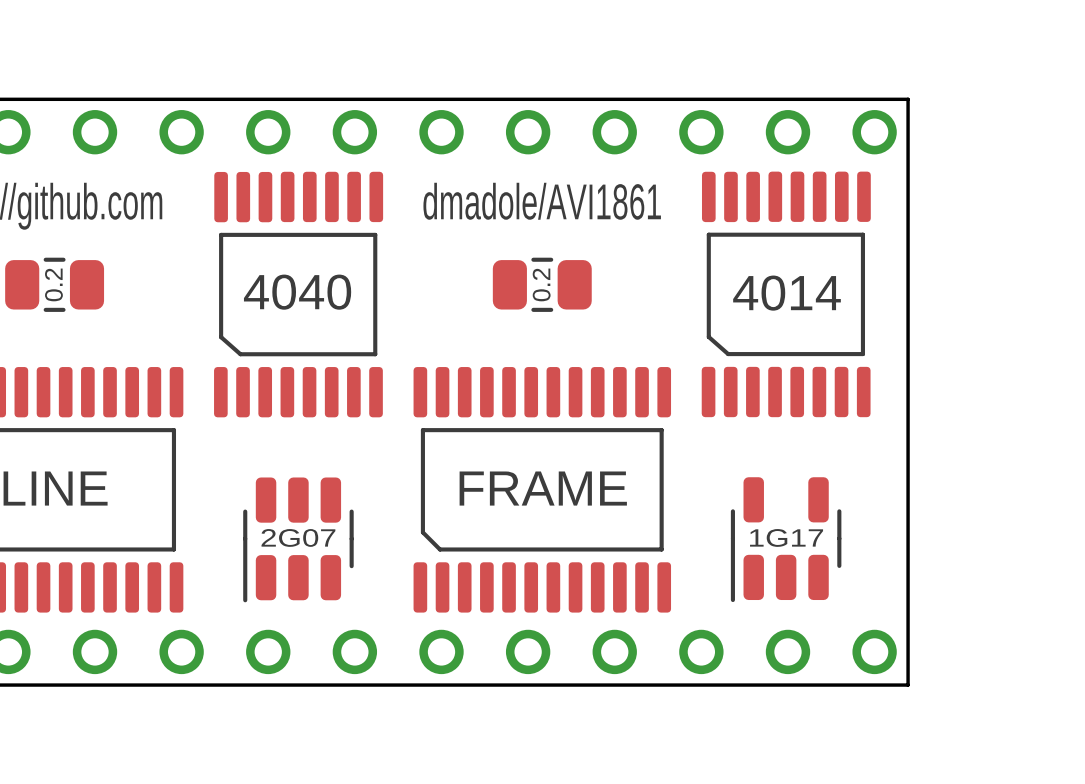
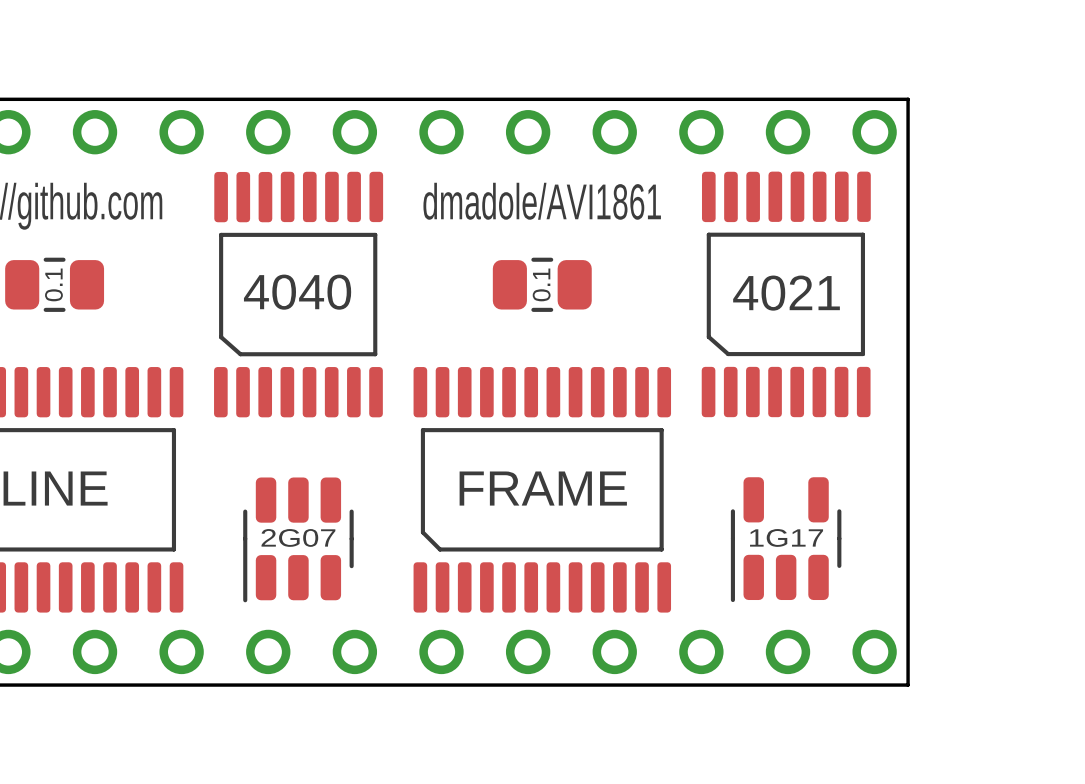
text: 0.2 (53, 284) -> 0.1 (53, 284)
text: 0.2 (541, 284) -> 0.1 (541, 284)
part value: 4014 (787, 293) -> 4021 (786, 293)

